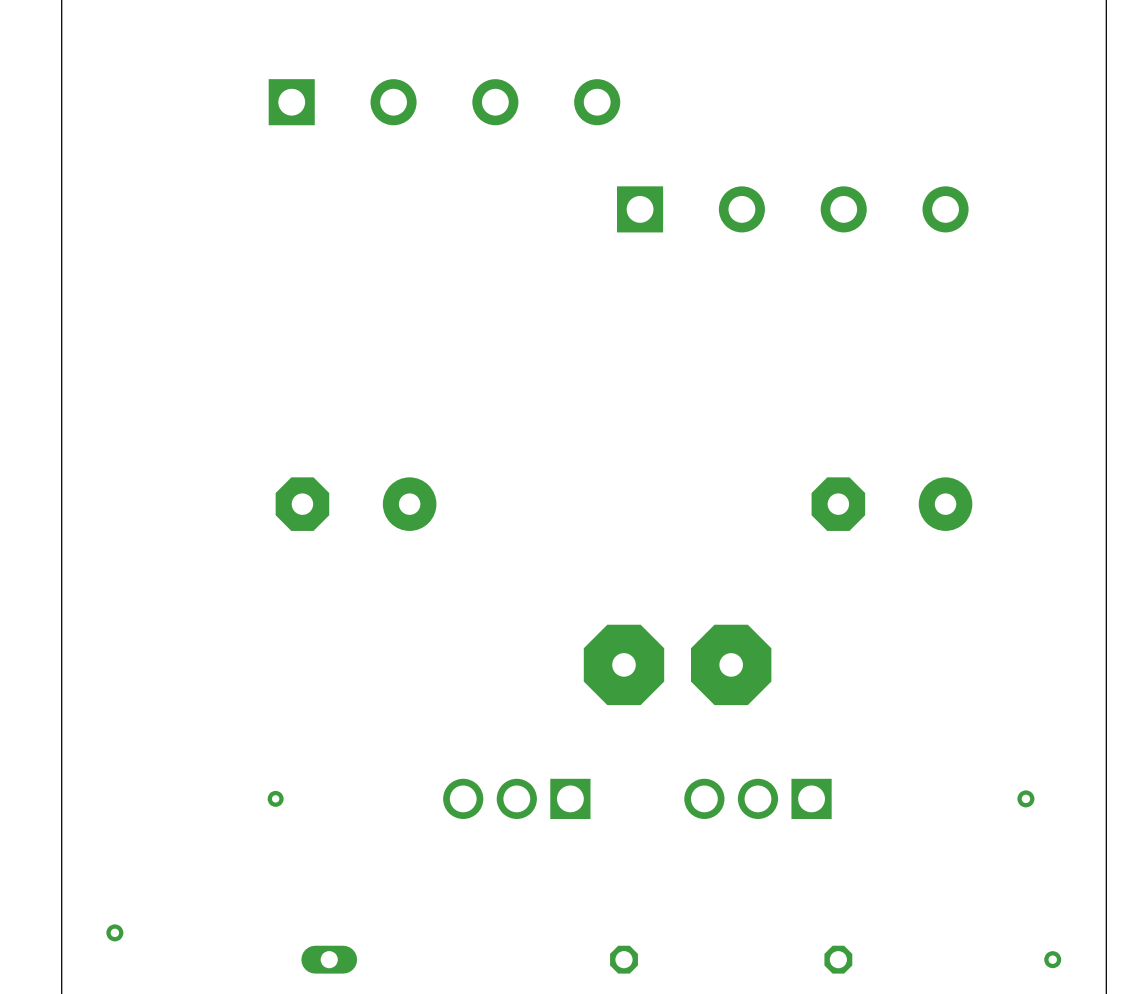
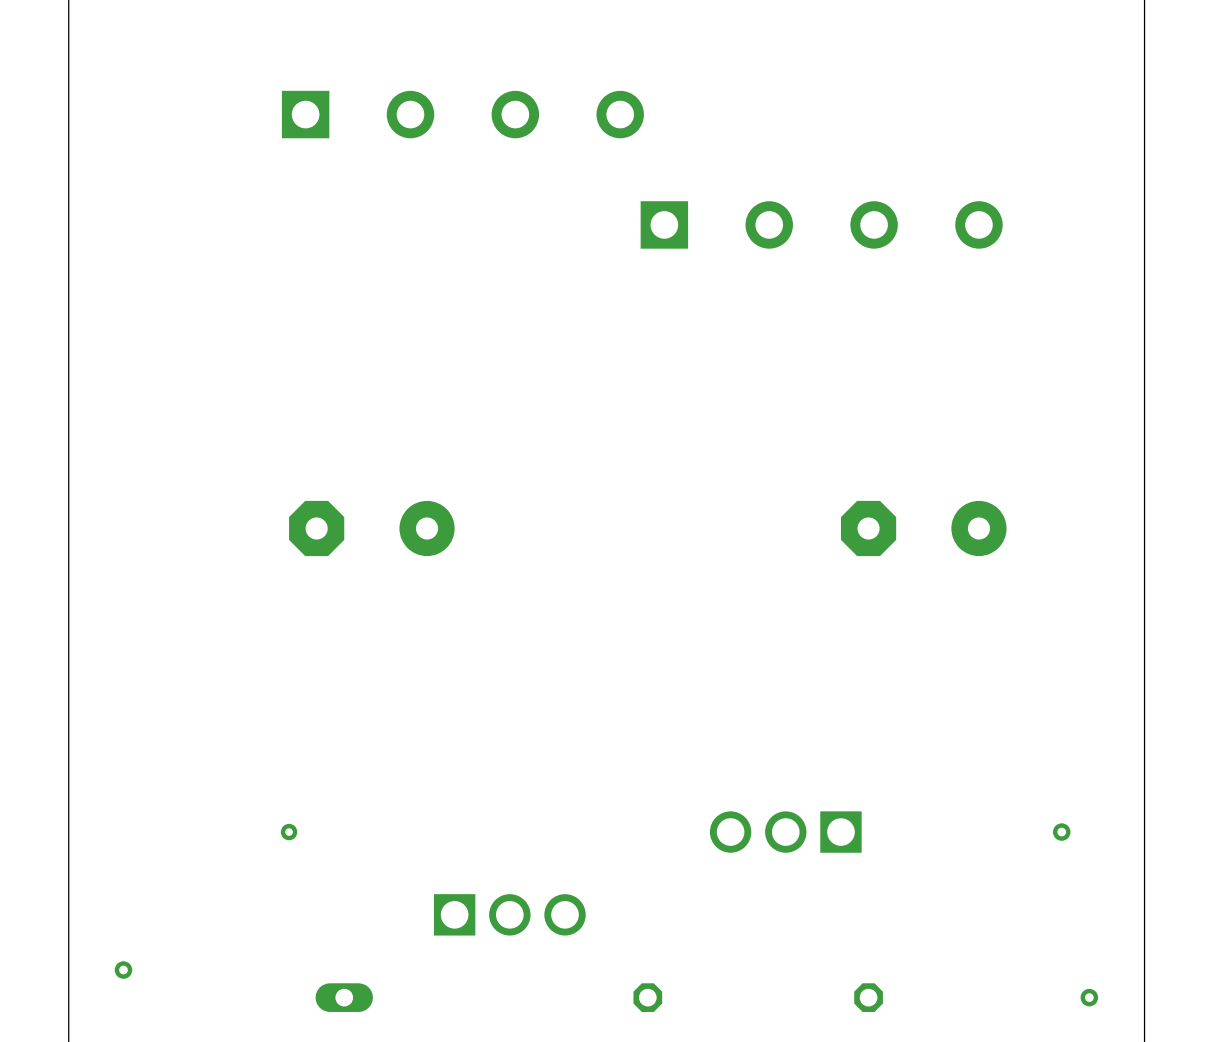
part: (623, 664) -> none
part: (731, 664) -> none
part rotation: 0° (516, 798) -> 180° (509, 914)

